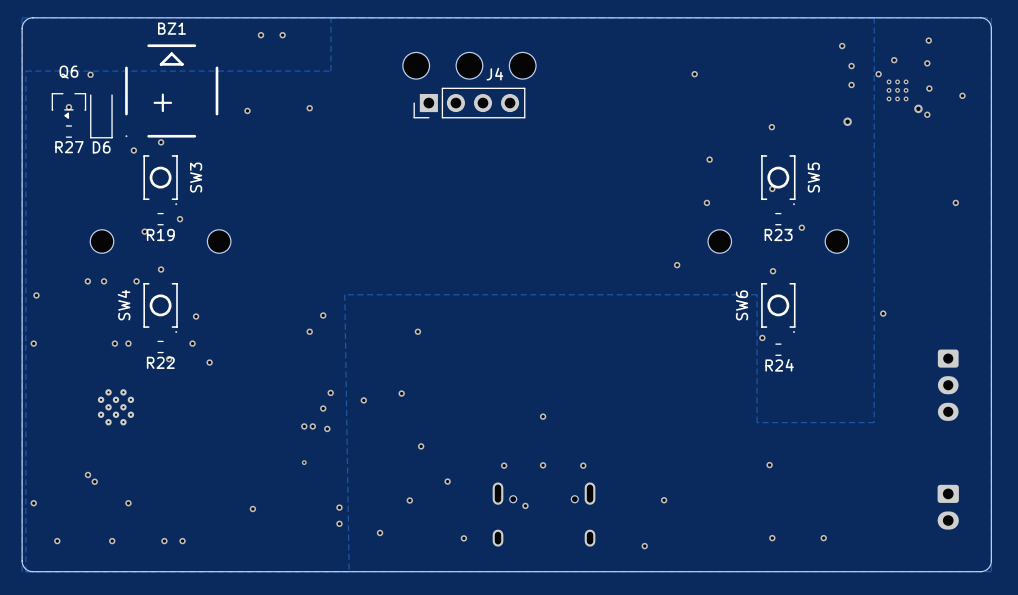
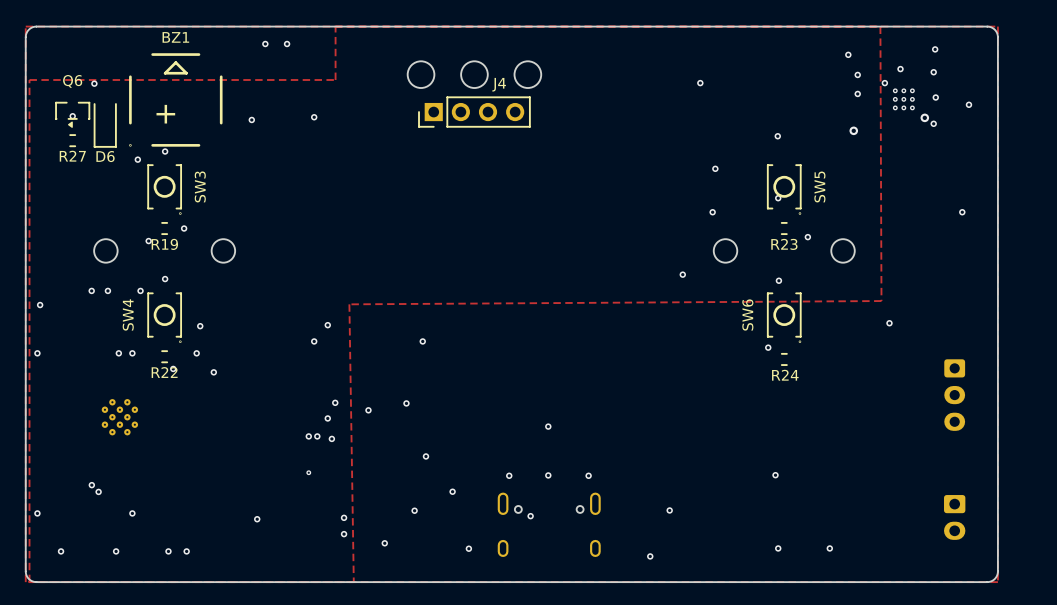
zone outline: (874, 17) (874, 422) (757, 422) (757, 294) (344, 294) -> (880, 26) (881, 301) (349, 304)

